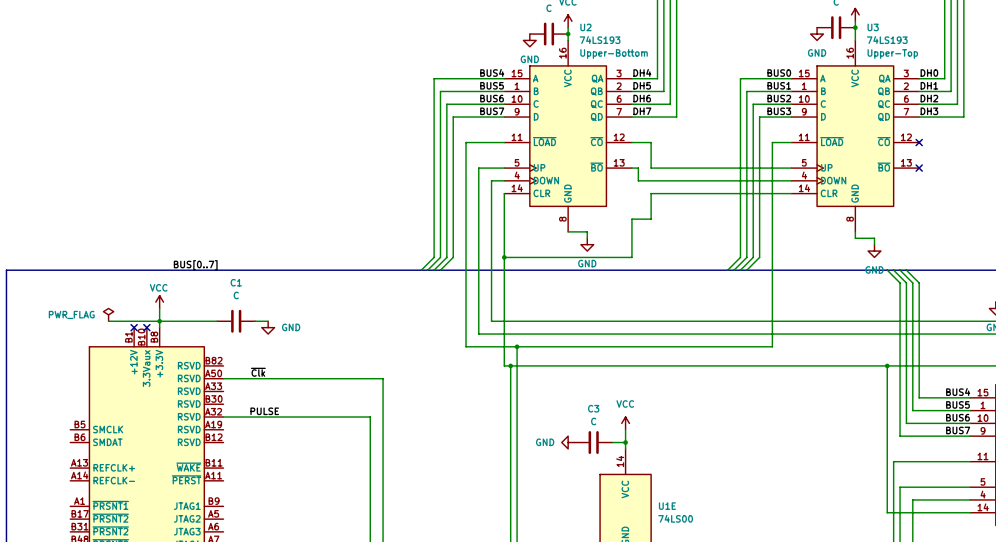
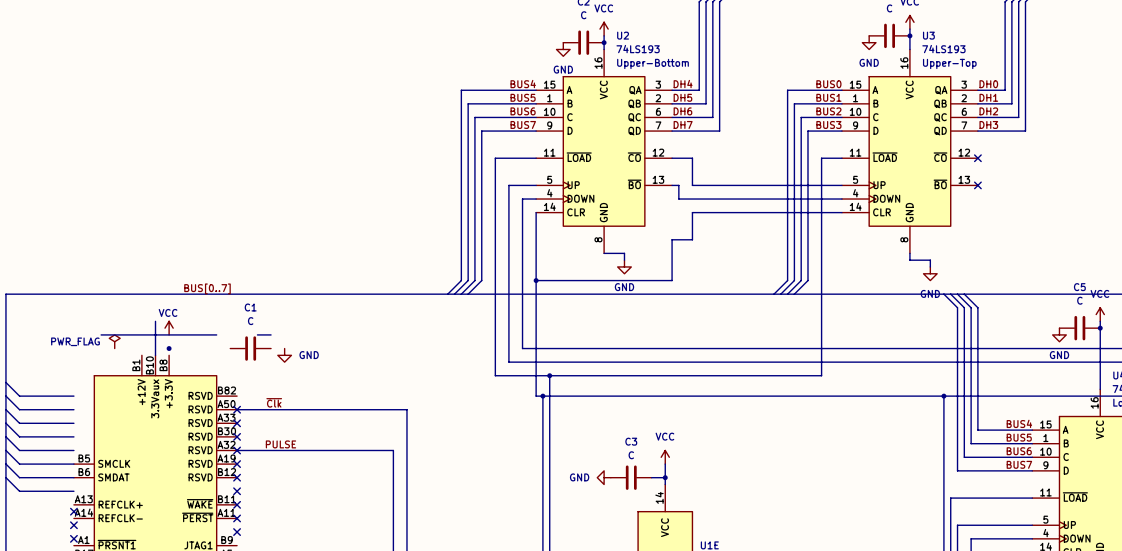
wire: none -> (155, 321) (155, 355)
wire: (159, 308) (159, 327) -> none
wire: (108, 321) (217, 321) -> (101, 334) (216, 334)
wire: (255, 321) (268, 321) -> (257, 334) (271, 334)
no-connect mark: (134, 327) -> none
no-connect mark: (146, 327) -> none
wire: none -> (5, 382) (19, 396) (73, 396)
wire: none -> (5, 396) (19, 409) (73, 409)
wire: none -> (5, 409) (19, 423) (73, 423)
no-connect mark: none -> (237, 409)
wire: none -> (5, 423) (19, 436) (73, 436)
no-connect mark: none -> (237, 423)
wire: none -> (5, 436) (19, 450) (73, 450)
no-connect mark: none -> (237, 436)
wire: none -> (5, 450) (19, 464) (73, 464)
no-connect mark: none -> (237, 450)
wire: none -> (5, 464) (19, 477) (73, 477)
no-connect mark: none -> (237, 464)
wire: none -> (5, 477) (19, 491) (73, 491)
no-connect mark: none -> (237, 477)
no-connect mark: none -> (237, 491)
no-connect mark: none -> (237, 504)
no-connect mark: none -> (73, 511)
no-connect mark: none -> (237, 518)
no-connect mark: none -> (73, 525)
no-connect mark: none -> (237, 532)
no-connect mark: none -> (73, 538)

